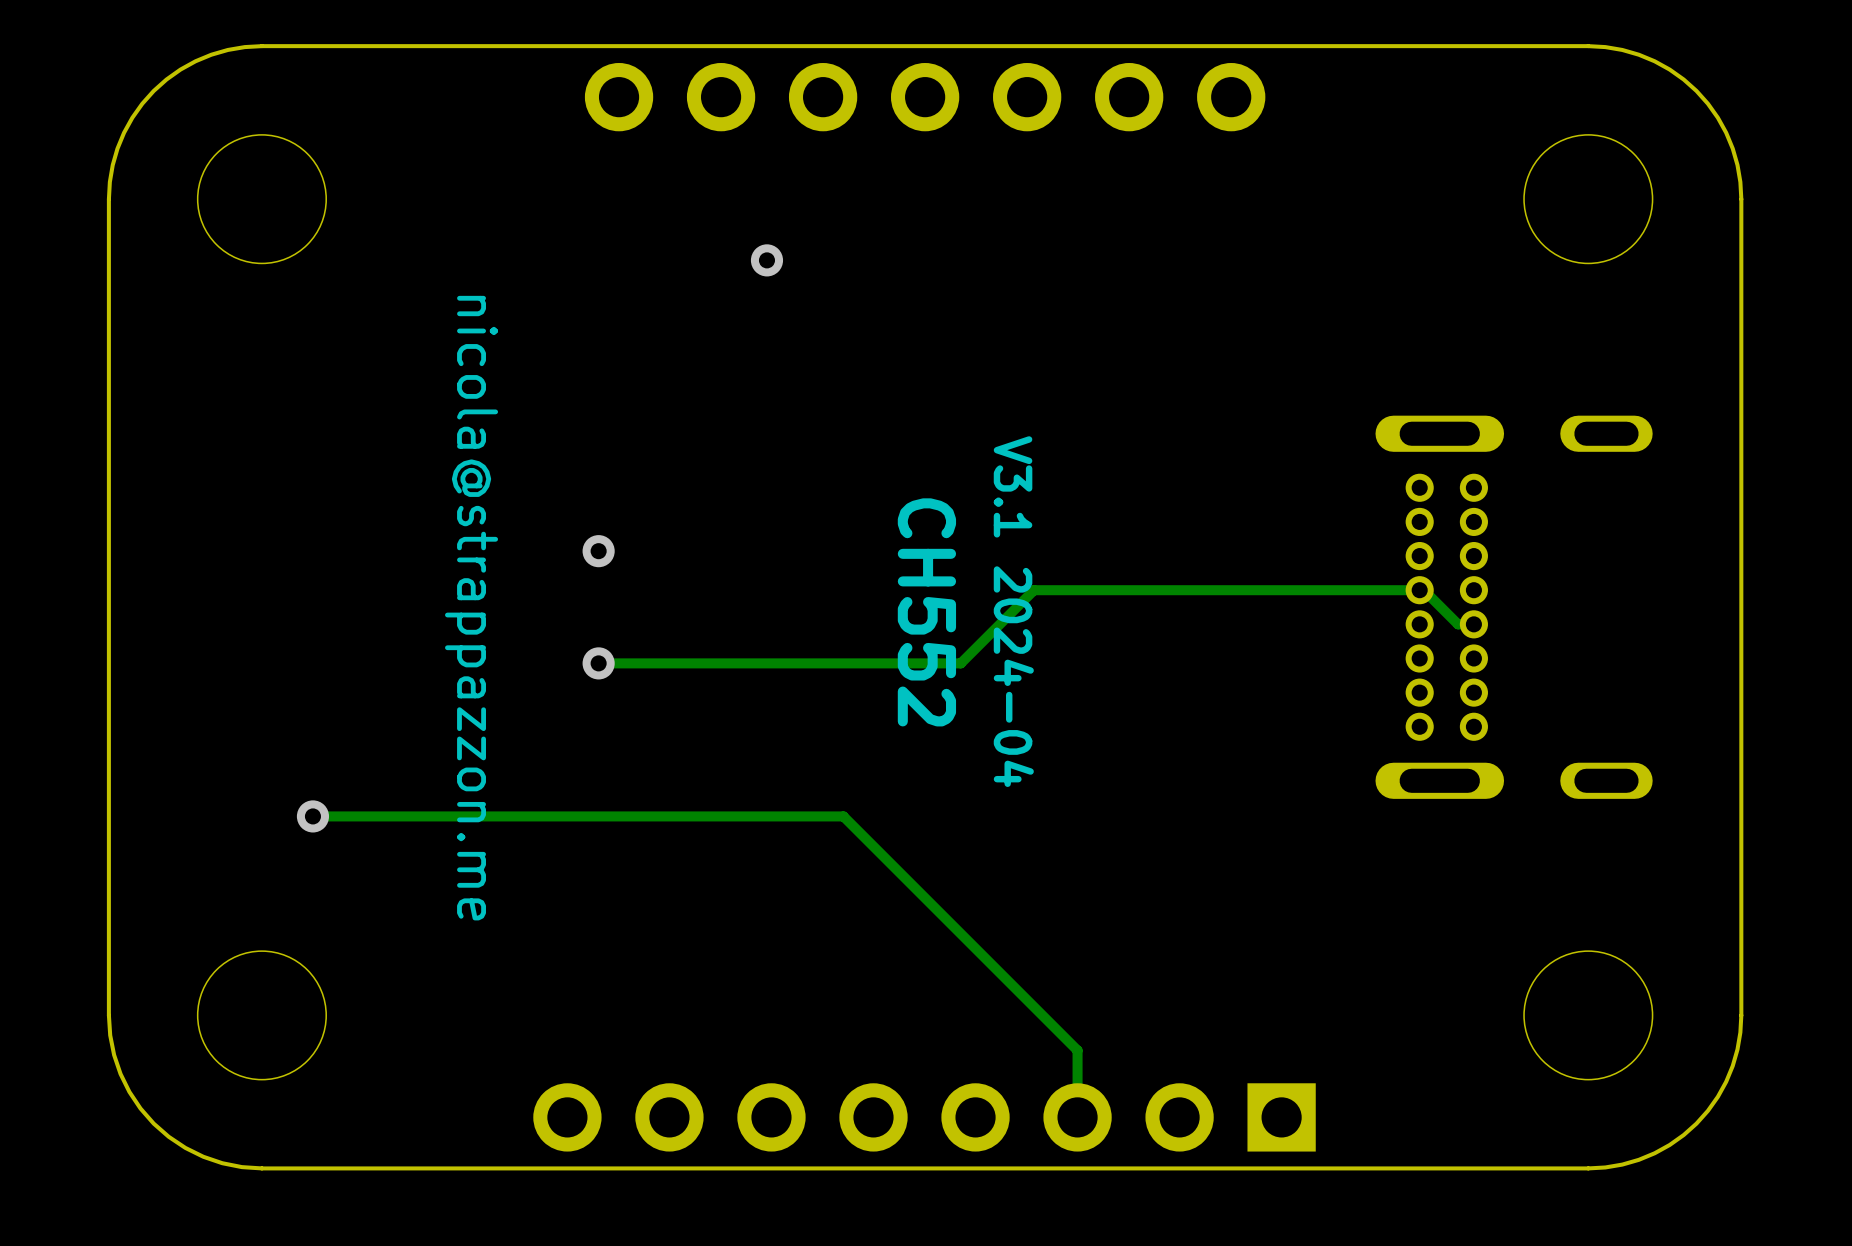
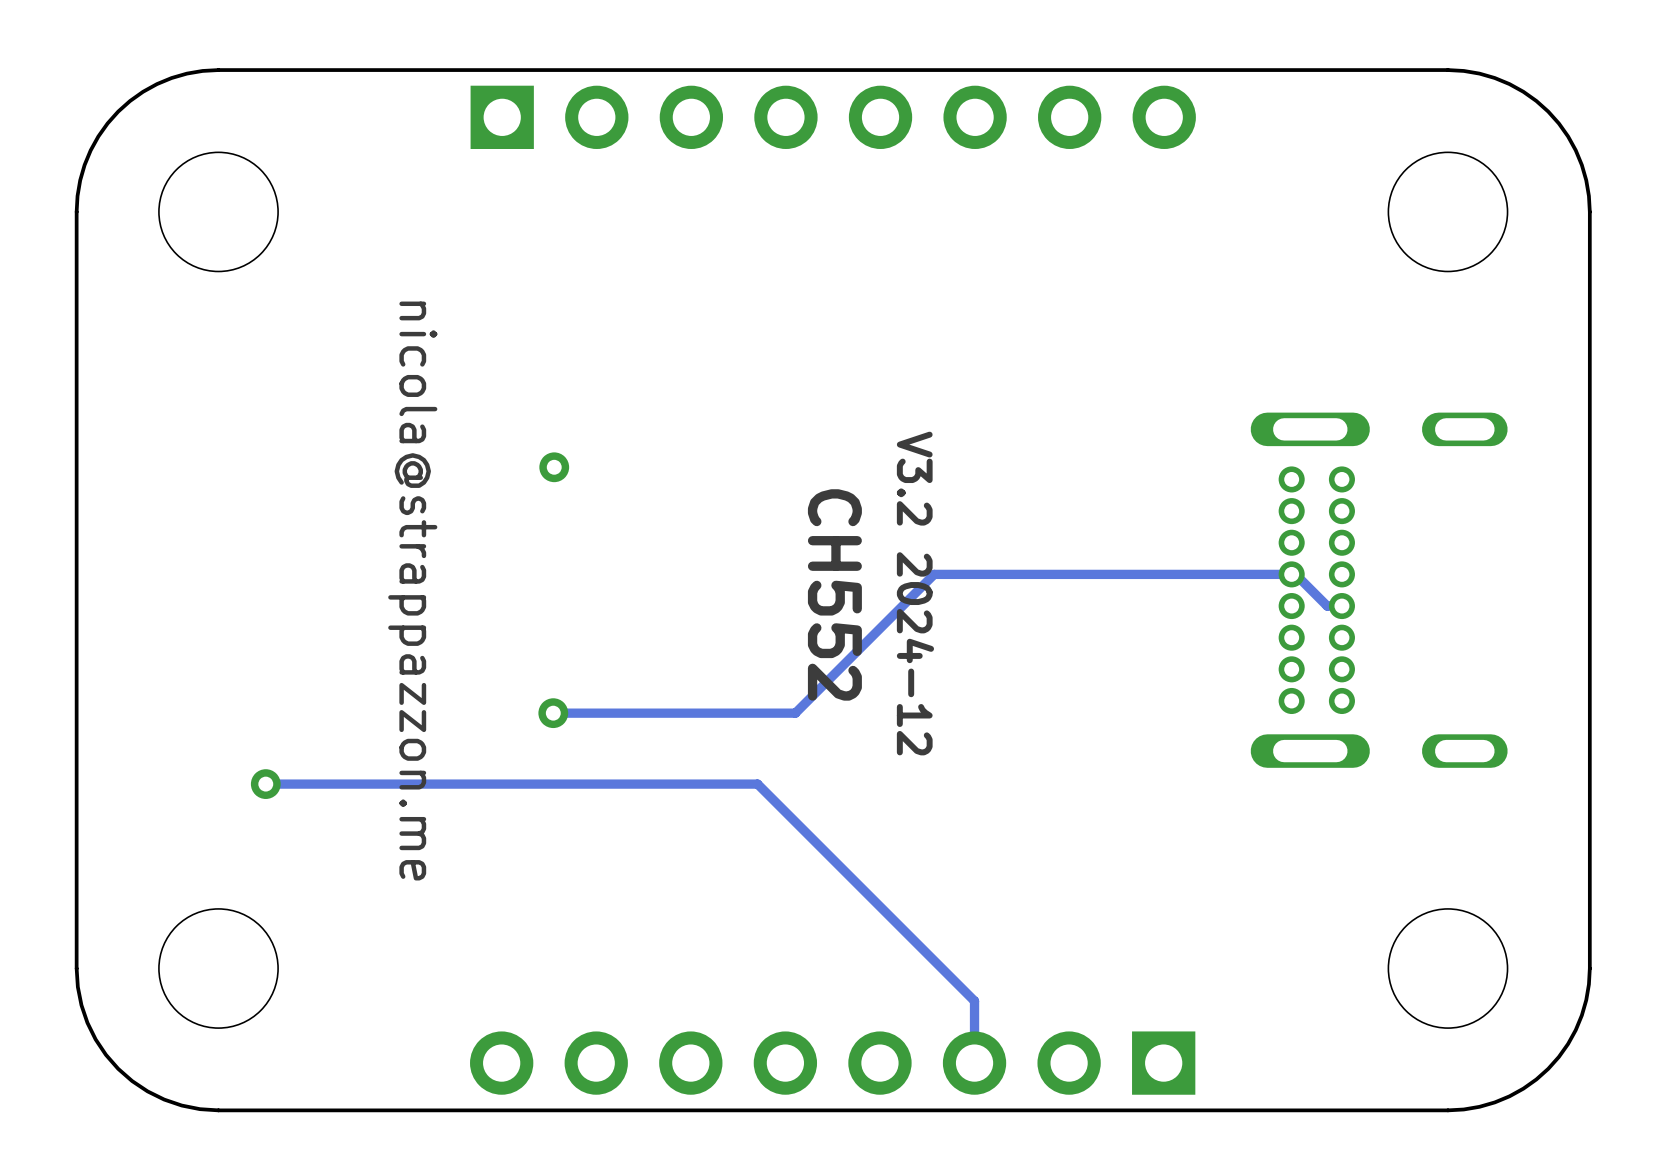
part footprint: [584, 63, 1266, 132] -> [470, 85, 1196, 149]
via: (766, 260) -> none
via position: (598, 551) -> (554, 467)
text: V3.1 2024-04 (1013, 611) -> V3.2 2024-12 (915, 593)
via position: (598, 663) -> (553, 713)
track: (960, 663) (598, 663) -> (866, 642) (795, 713) (553, 713)

